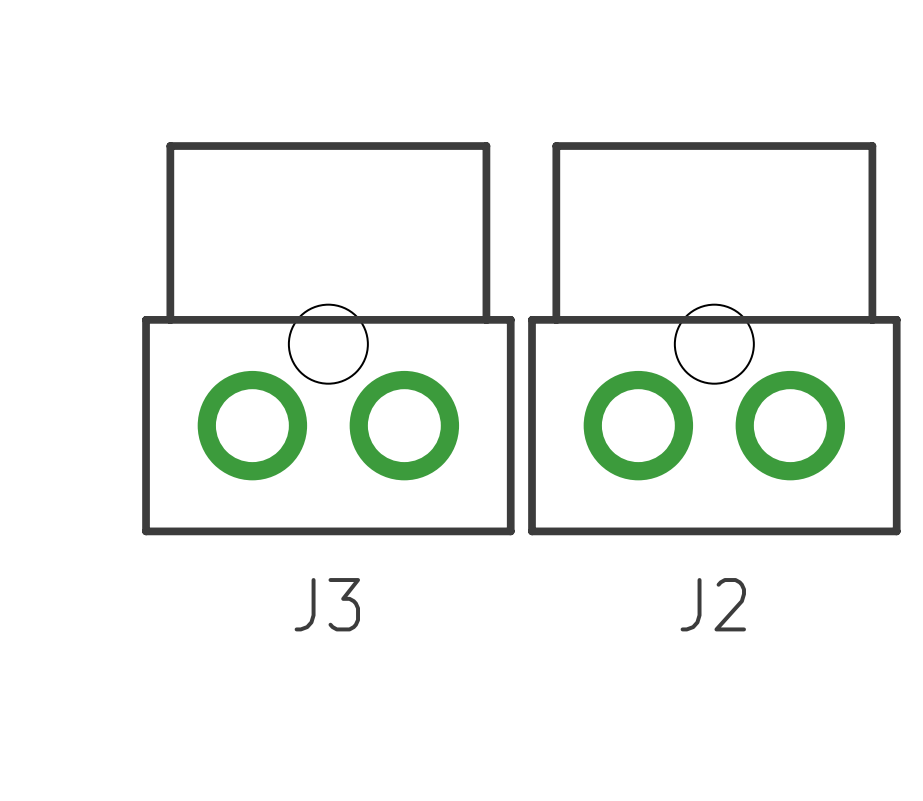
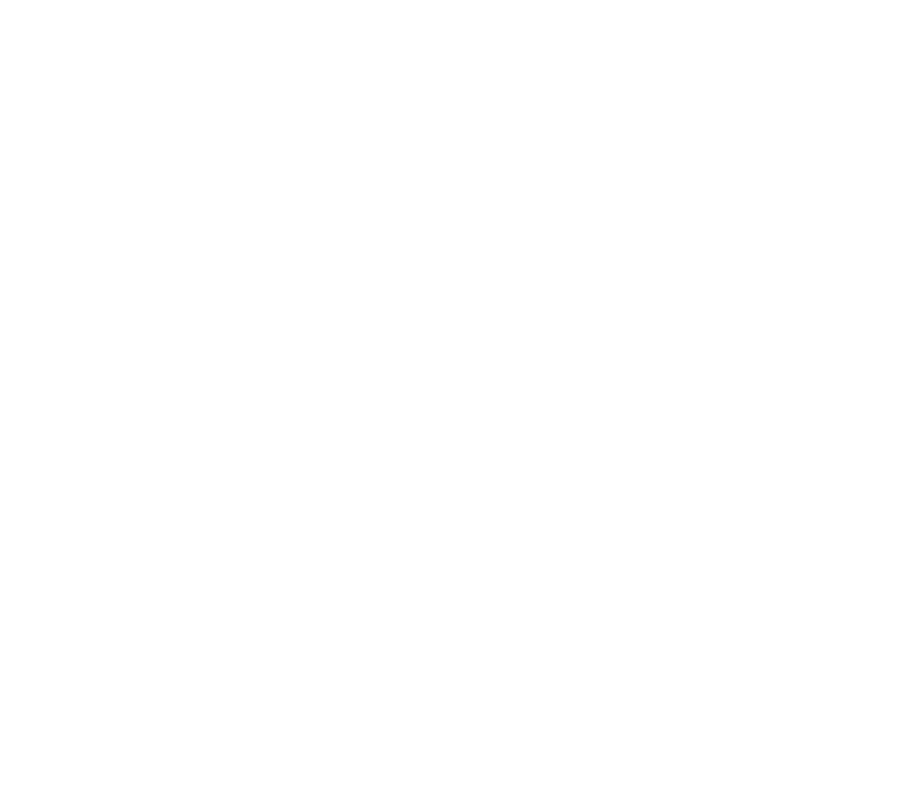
J3: (328, 338) -> none
J2: (714, 338) -> none

